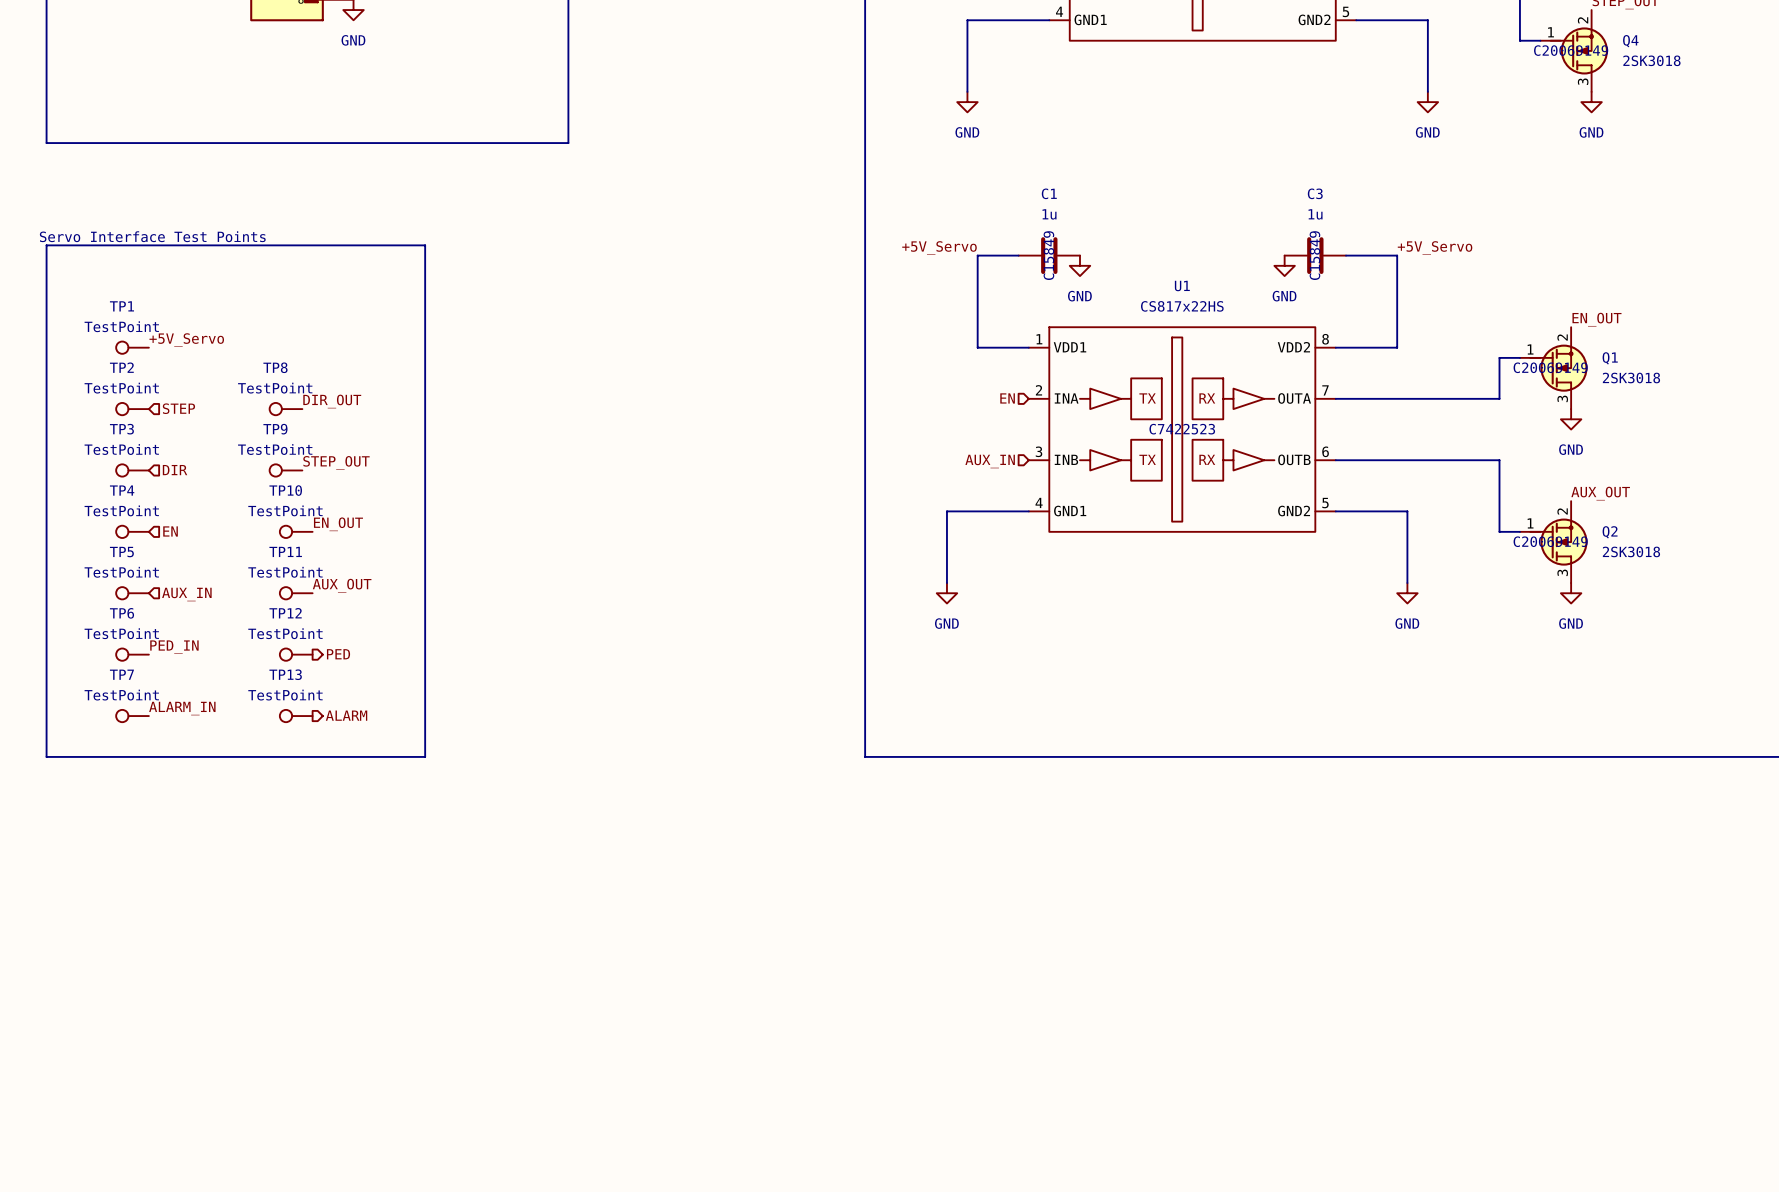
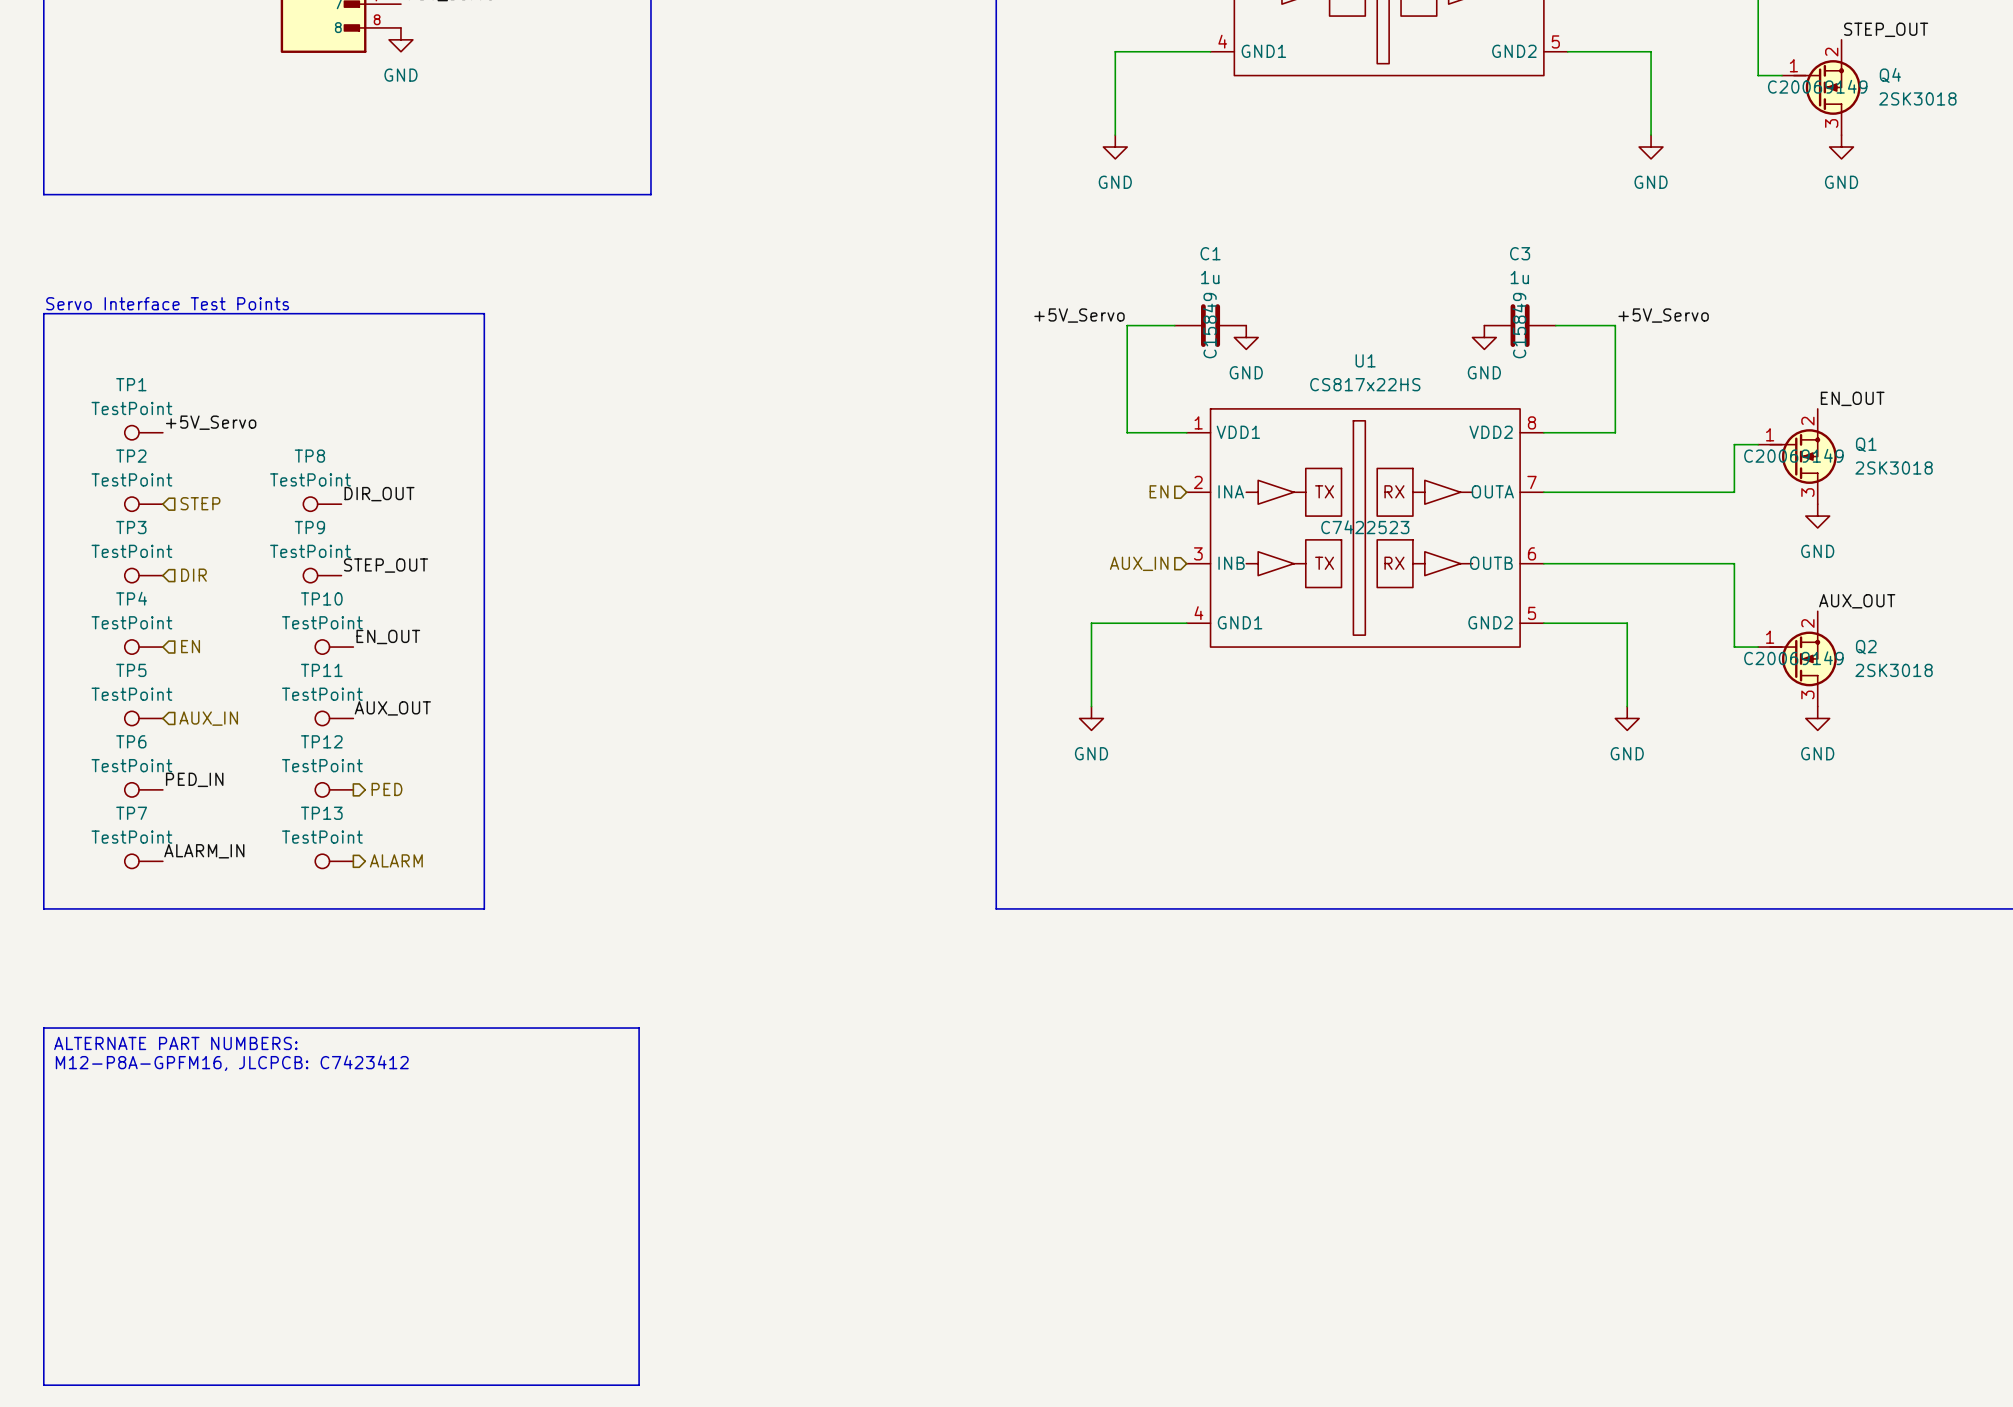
line: none -> (43, 1028) (639, 1028) (639, 1385) (43, 1385) (43, 1028)
text: none -> ALTERNATE PART NUMBERS: (175, 1043)
text: none -> M12-P8A-GPFM16, JLCPCB: C7423412 (232, 1063)

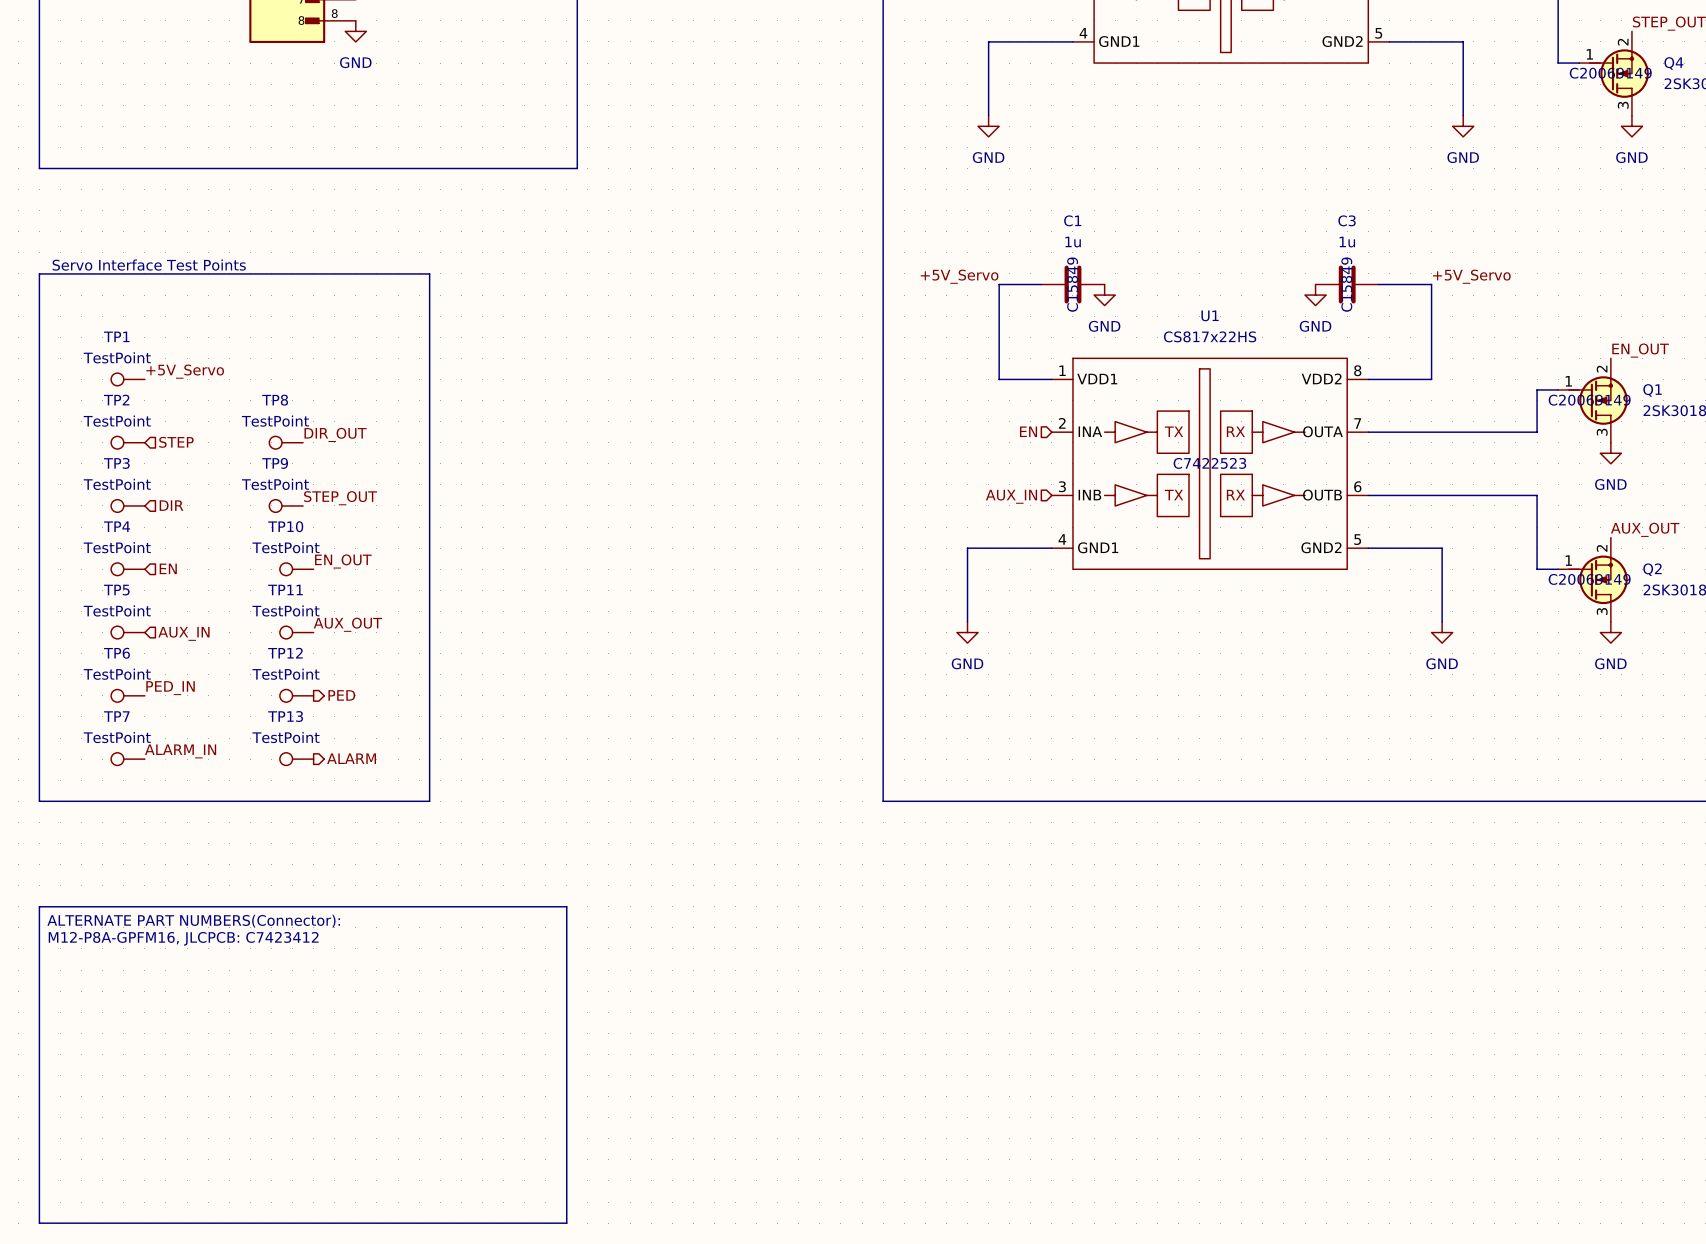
text: ALTERNATE PART NUMBERS: (175, 1043) -> ALTERNATE PART NUMBERS(Connector): (193, 921)

